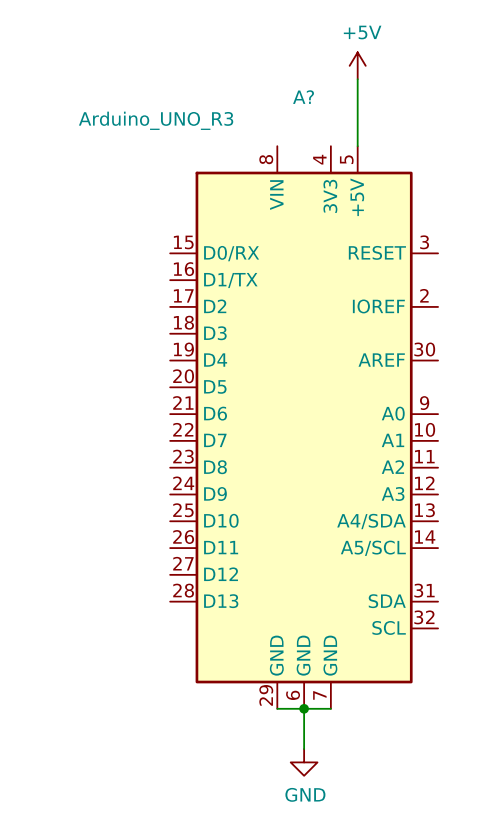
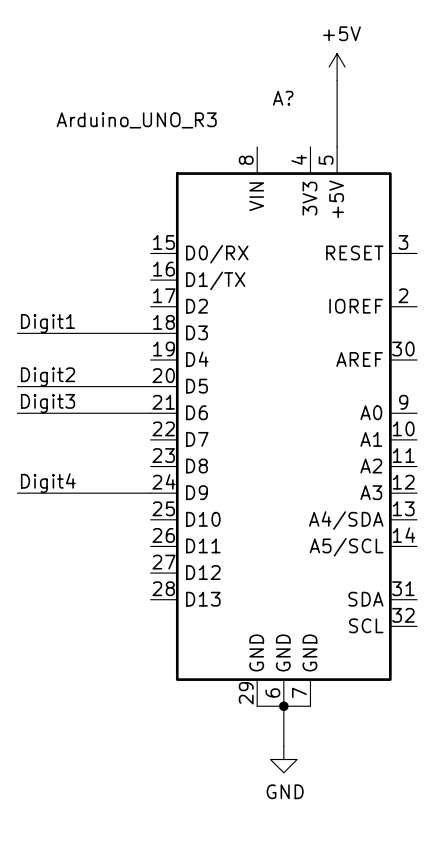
label: none -> Digit1 (48, 323)
wire: none -> (17, 333) (150, 333)
label: none -> Digit2 (48, 376)
wire: none -> (17, 386) (150, 386)
label: none -> Digit3 (48, 403)
wire: none -> (17, 413) (150, 413)
label: none -> Digit4 (48, 483)
wire: none -> (17, 493) (150, 493)

